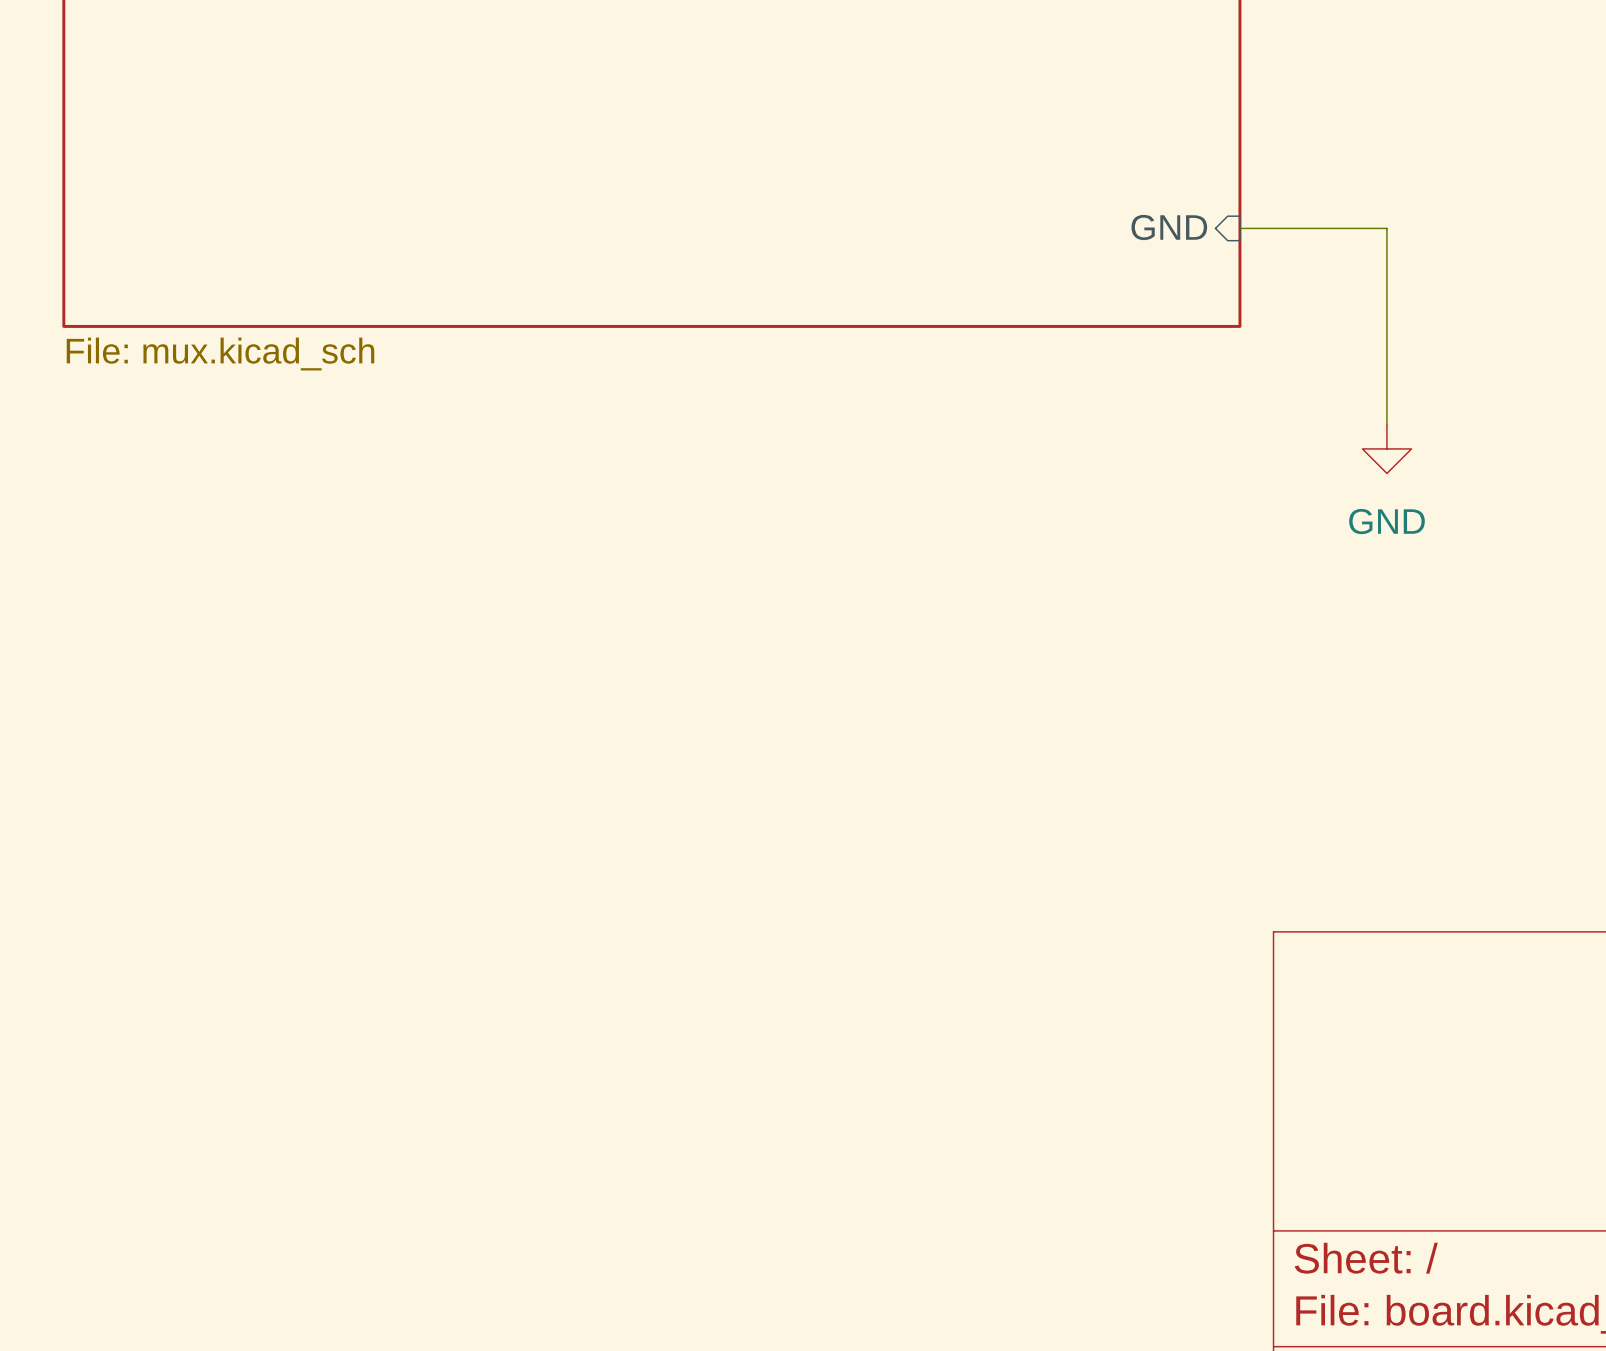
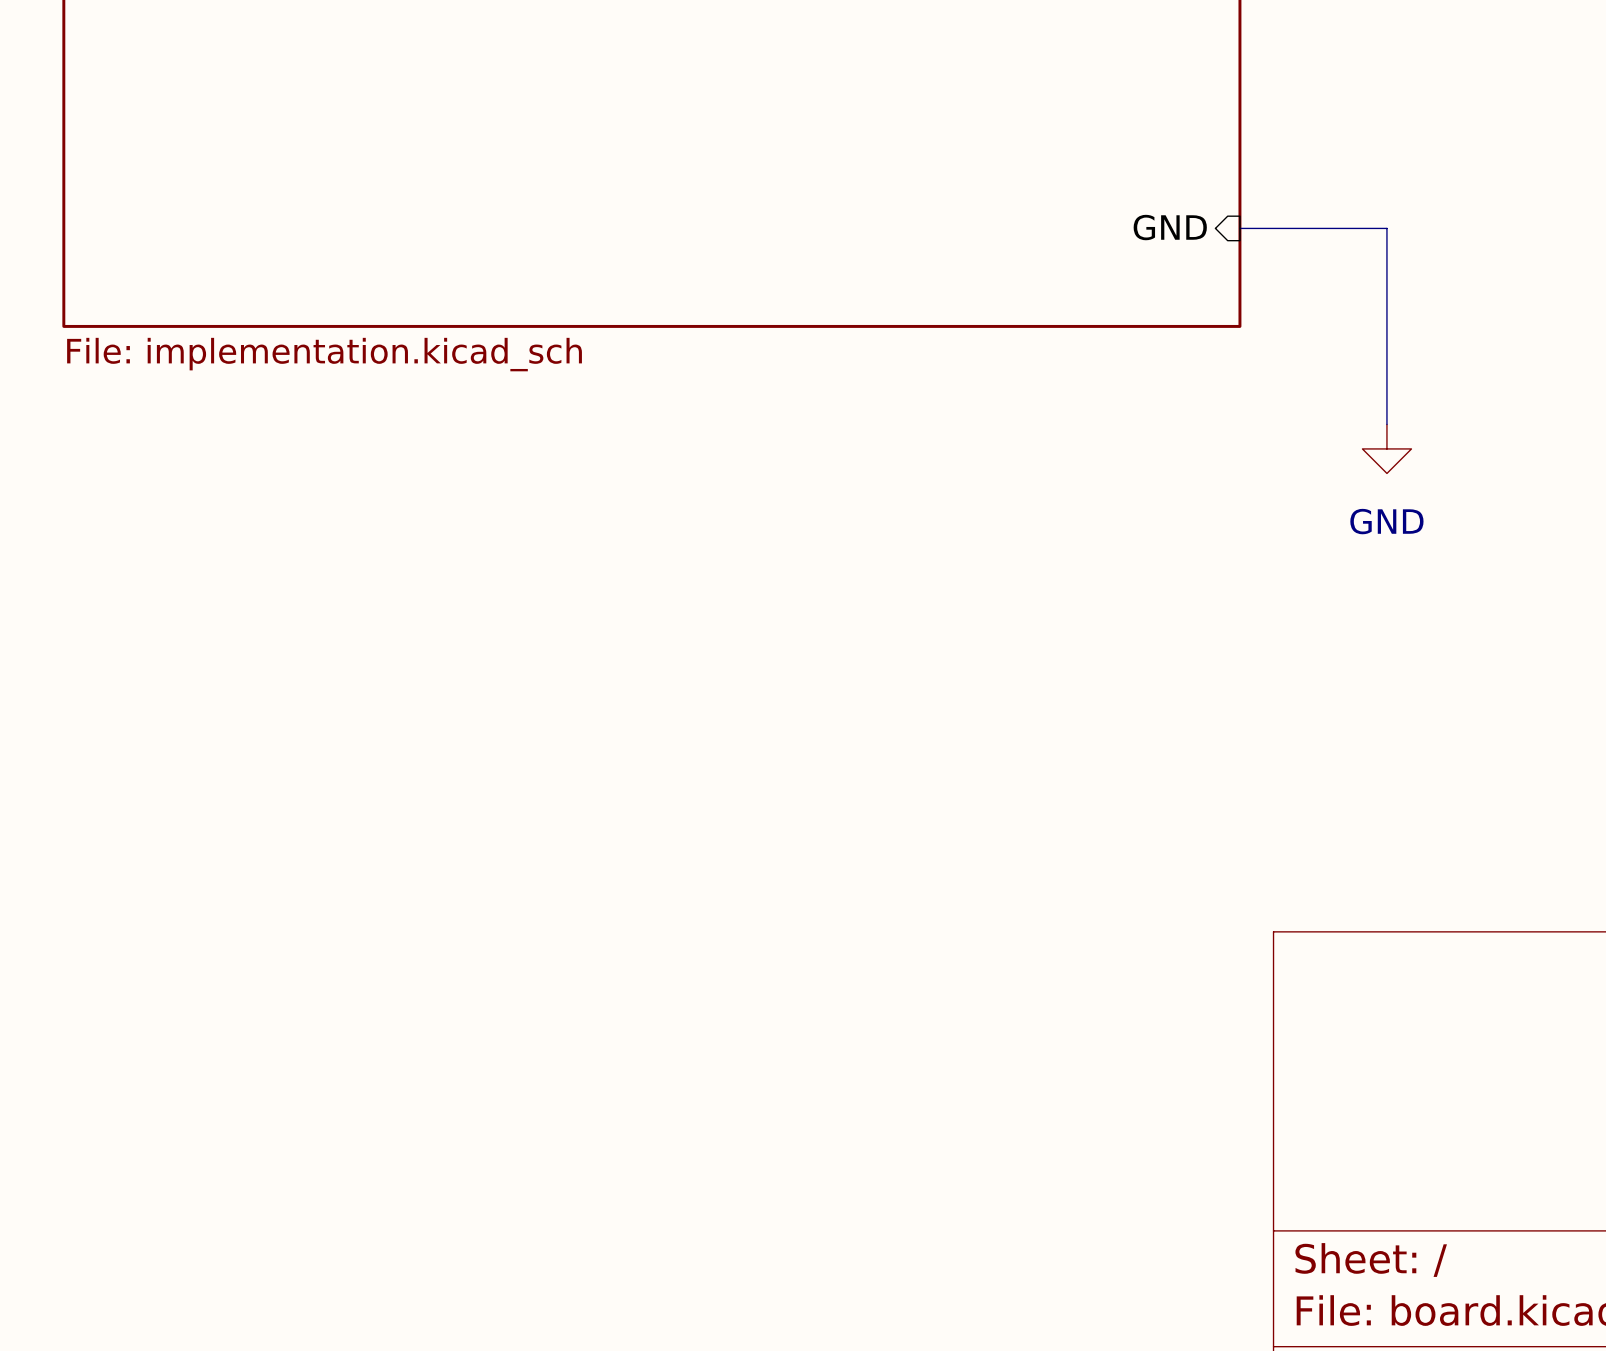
sheet value: File: mux.kicad_sch (220, 354) -> File: implementation.kicad_sch (324, 354)

